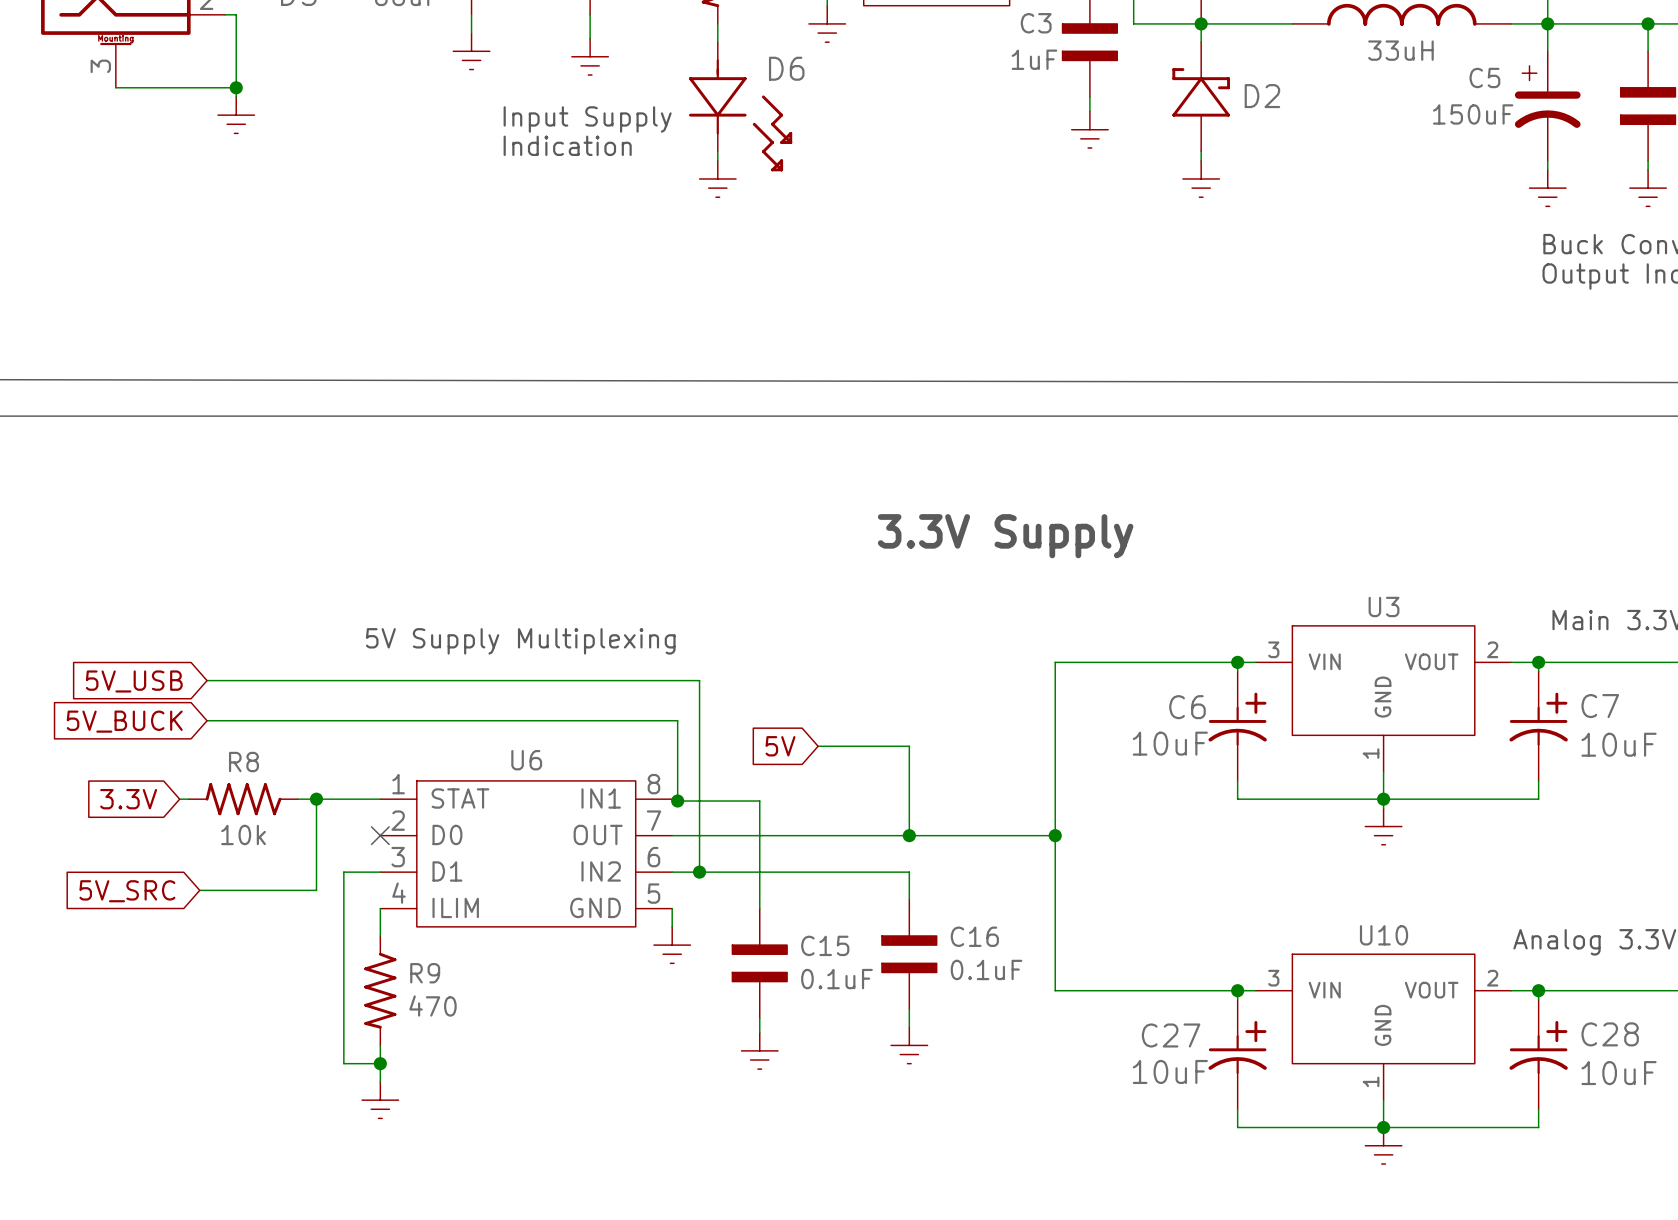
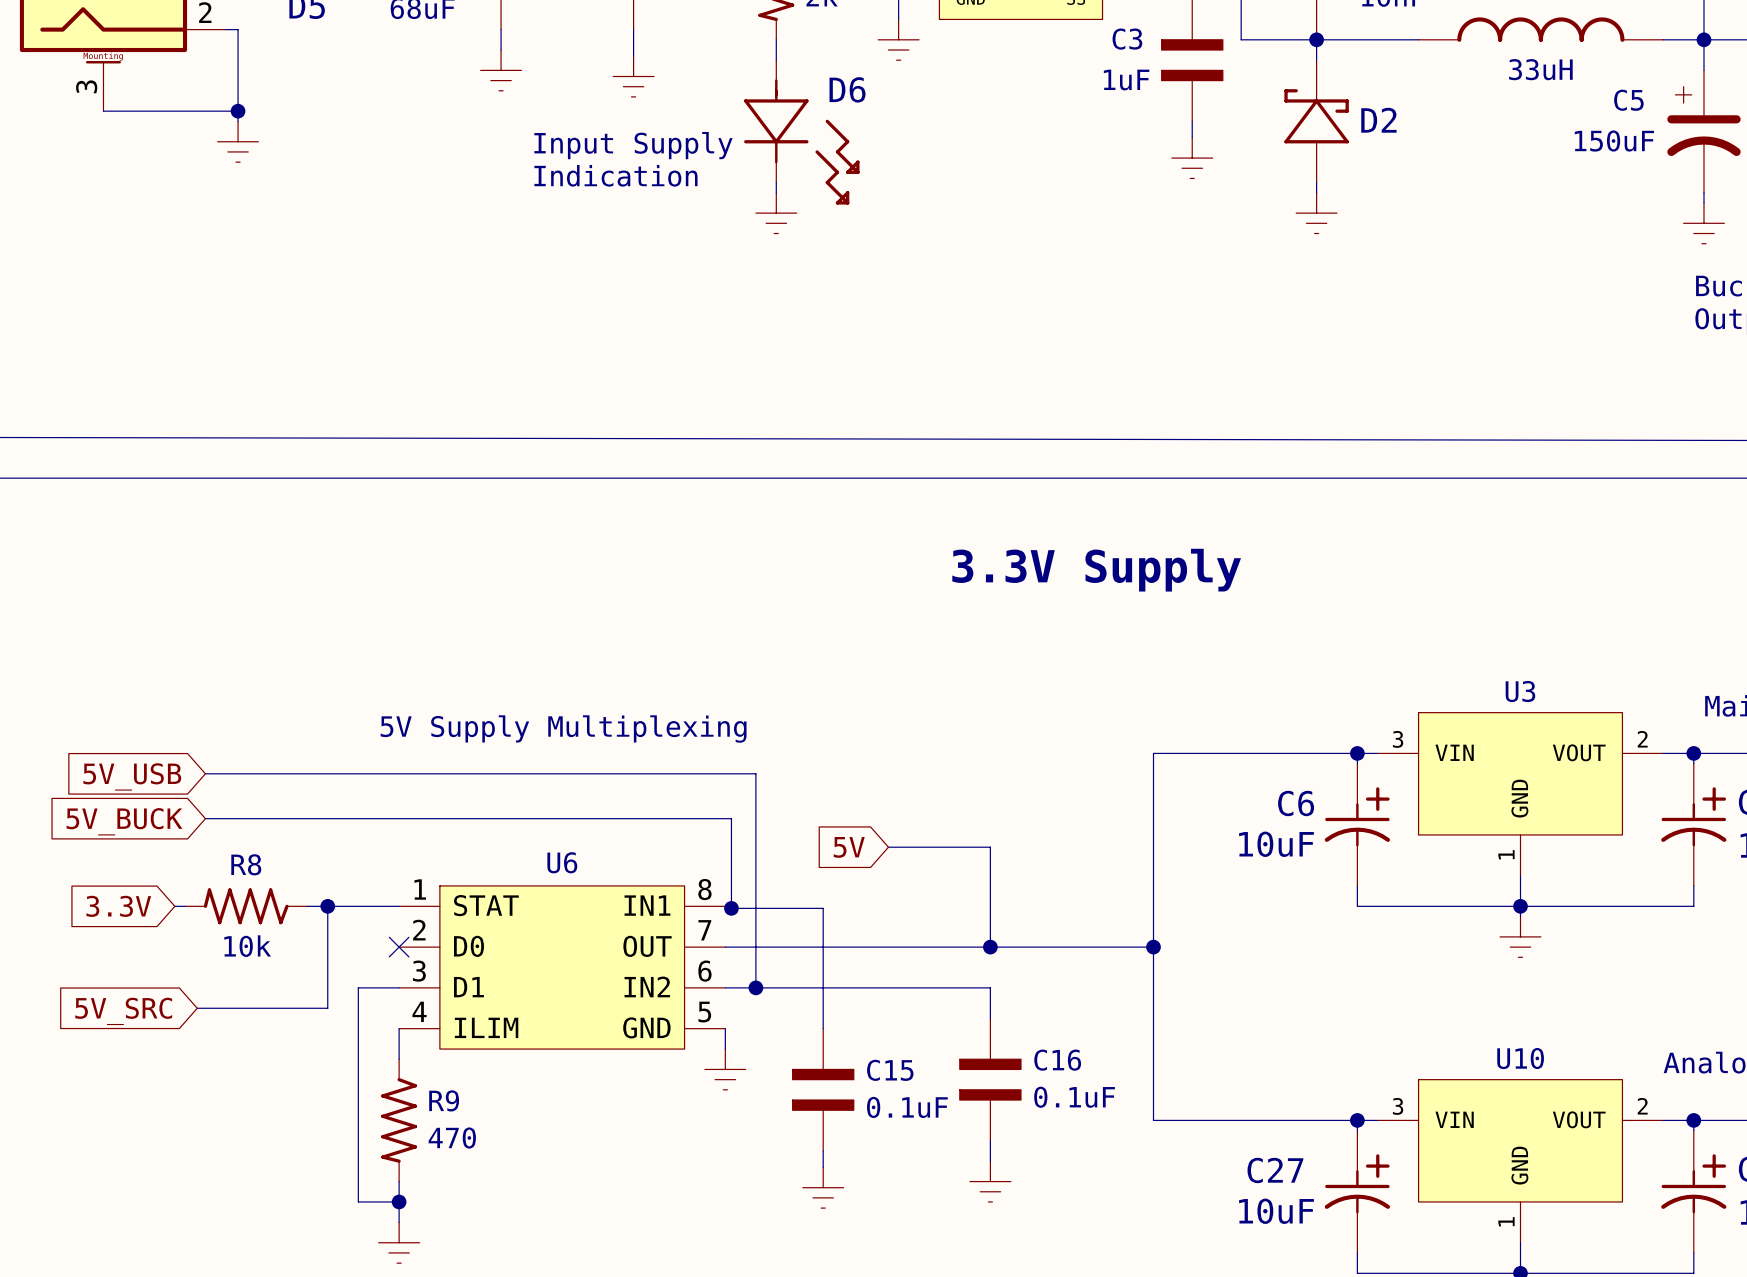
text position: 3.3V Supply (1005, 536) -> 3.3V Supply (1096, 570)

